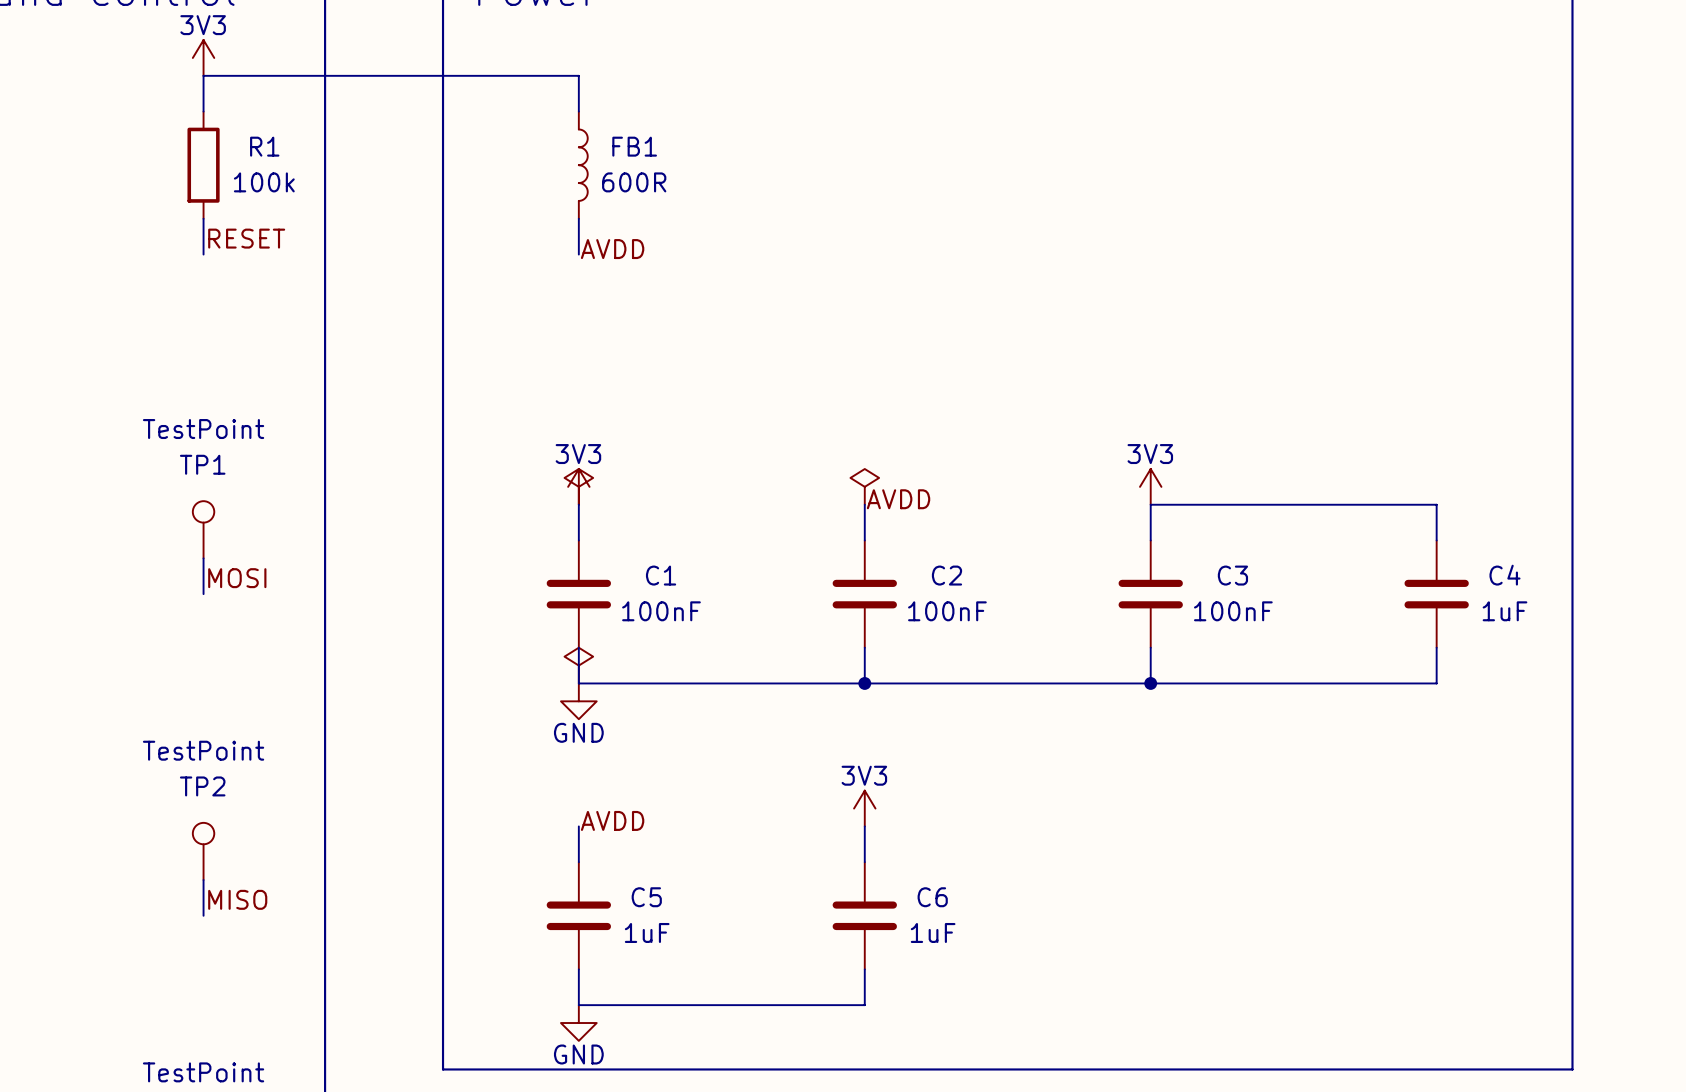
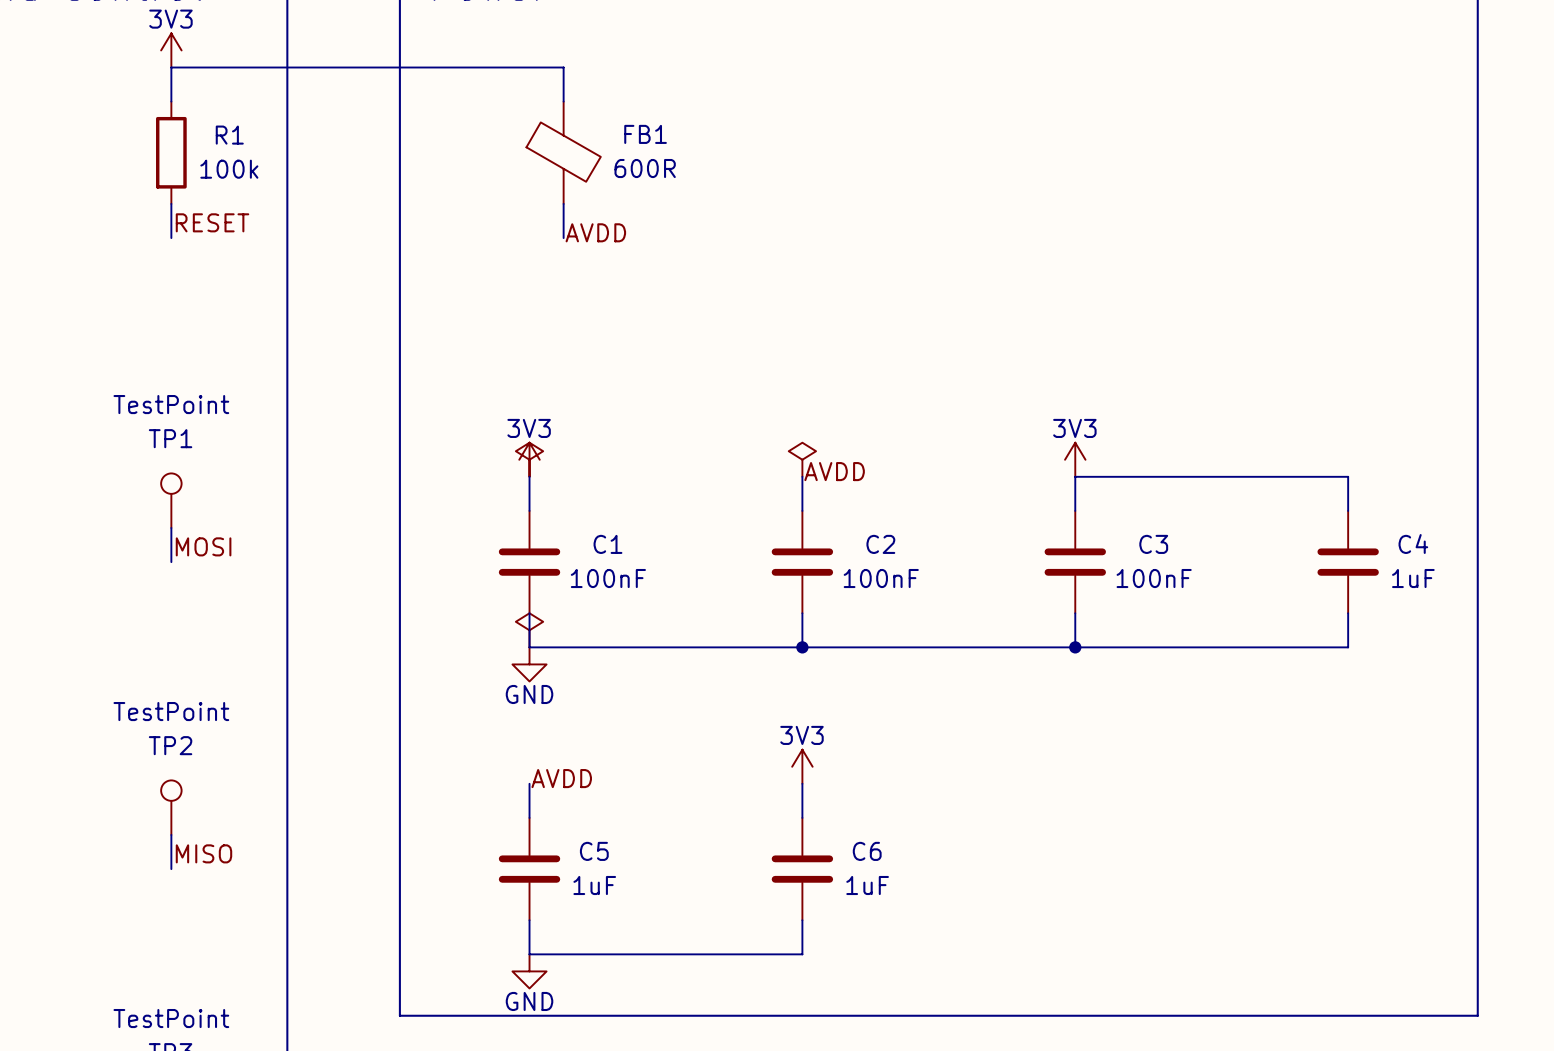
wire: (578, 75) (578, 111) -> (529, 67) (563, 67) (563, 101)
FB1 symbol: [578, 111, 588, 219] -> [526, 101, 601, 204]
FB1 name position: FB1 (634, 146) -> FB1 (645, 134)
FB1 value position: 600R (634, 182) -> 600R (645, 168)
wire: (578, 218) (578, 254) -> (563, 203) (563, 238)
label position: AVDD (612, 249) -> AVDD (595, 232)

